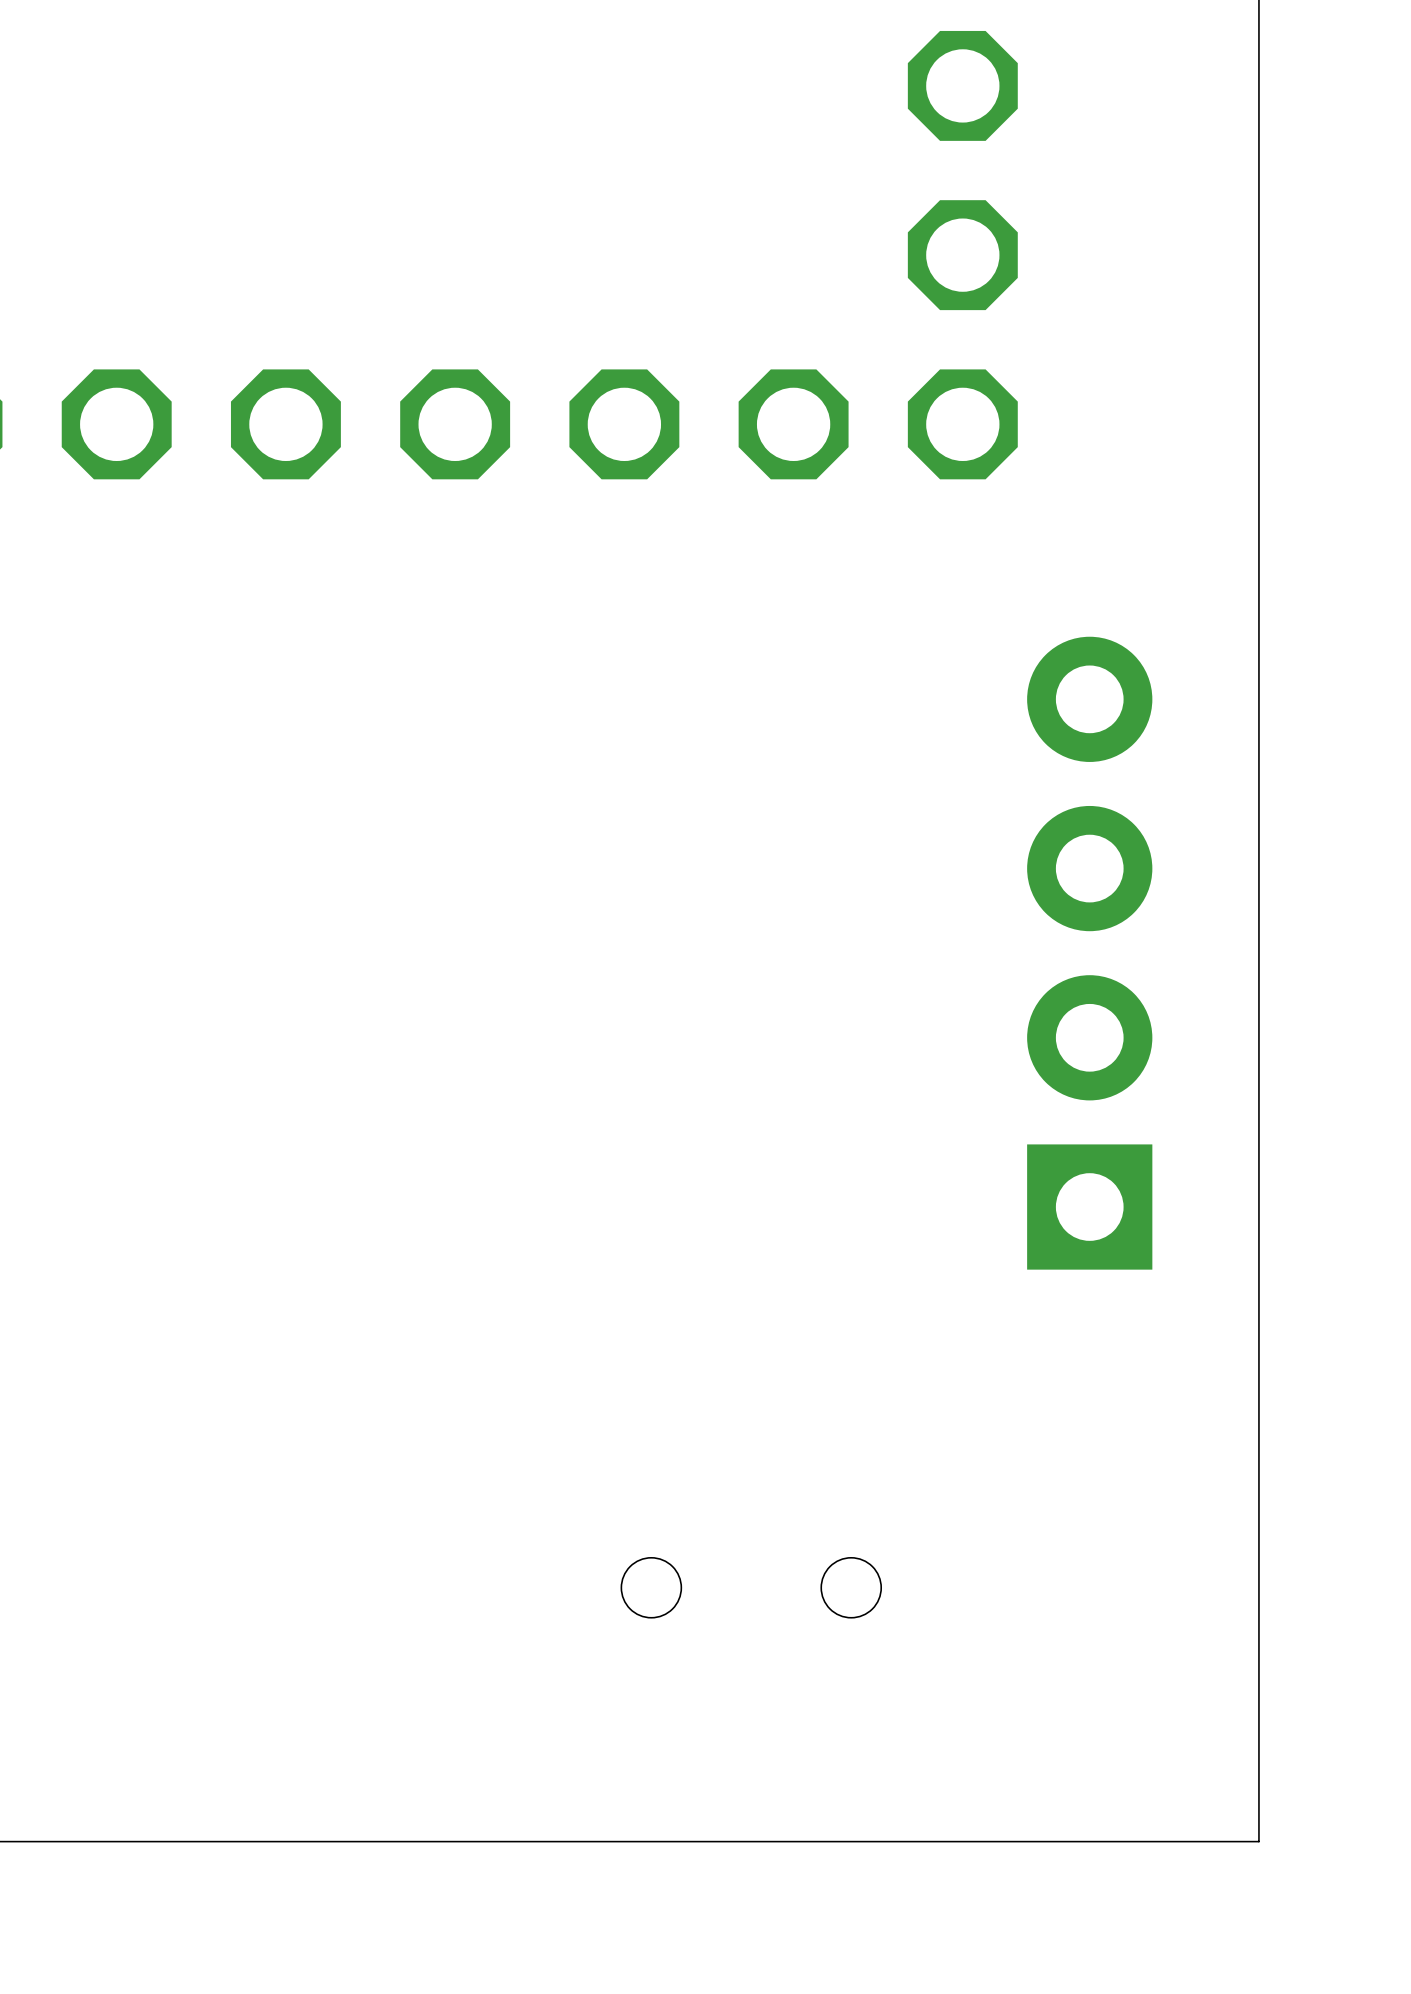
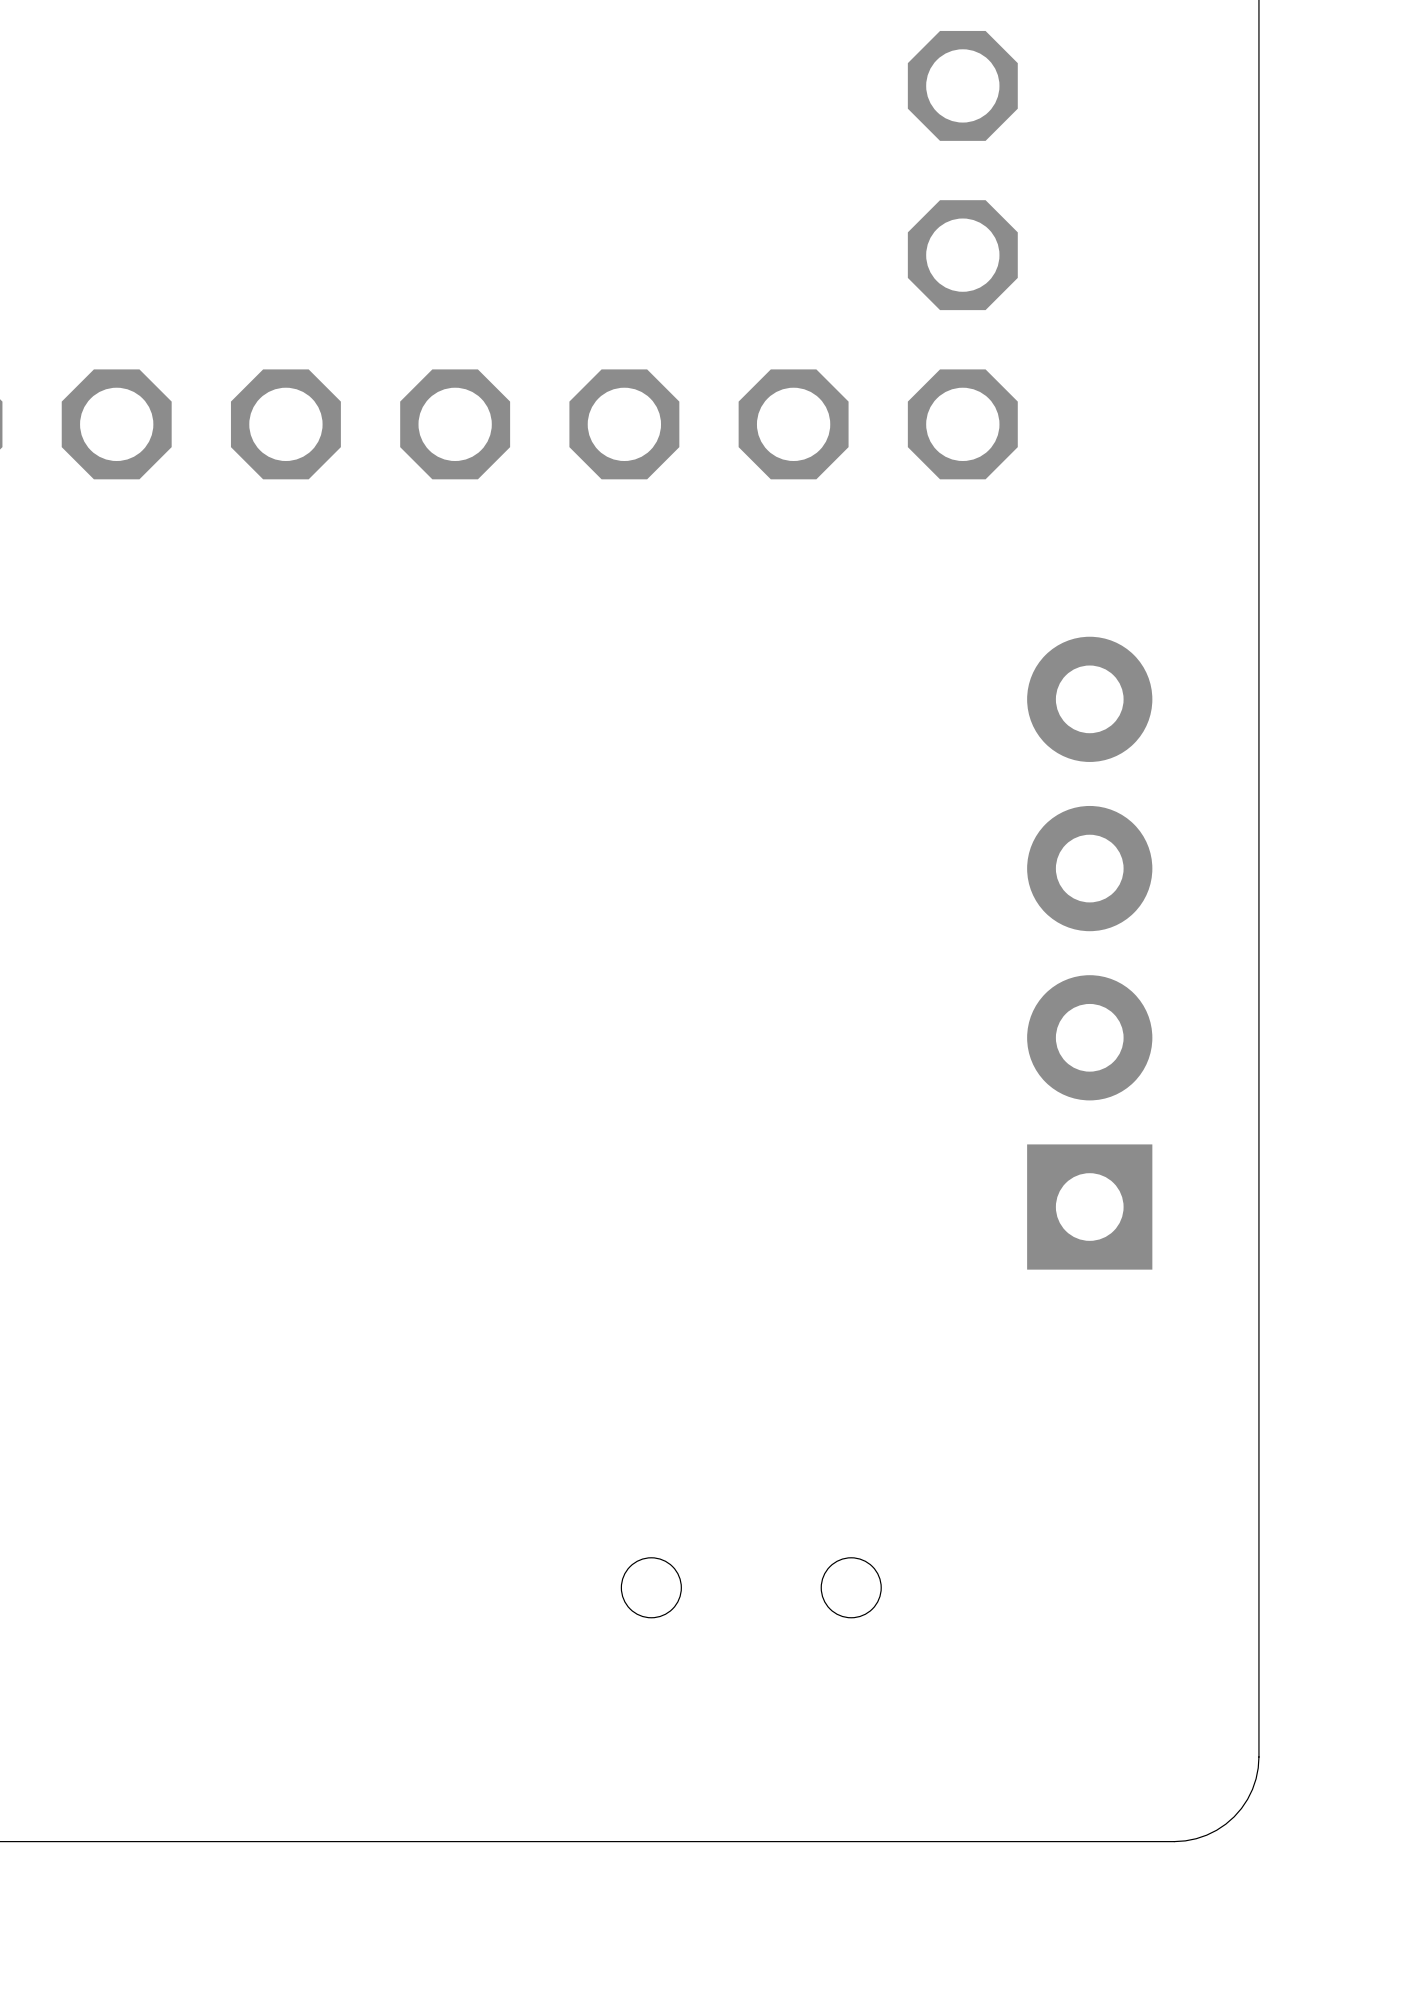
board edge: (1258, 1757) (1258, 1841) (1174, 1841) -> (1258, 1757) (1252, 1789) (1234, 1816) (1206, 1835) (1174, 1841)

